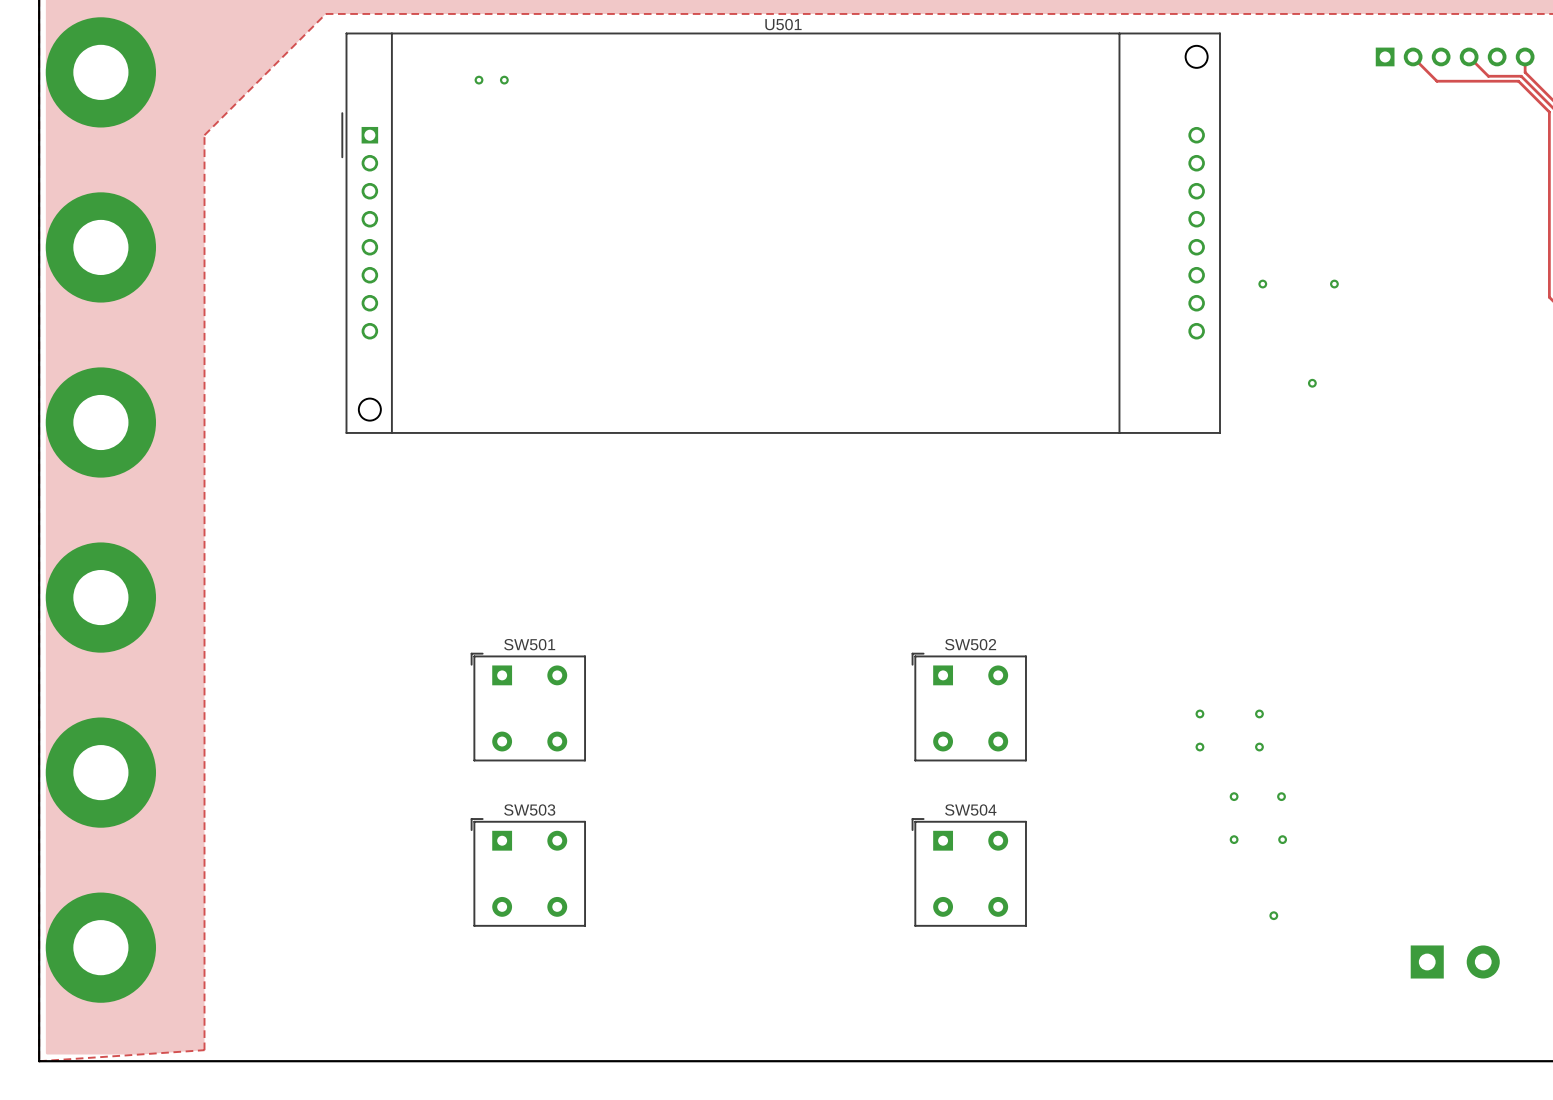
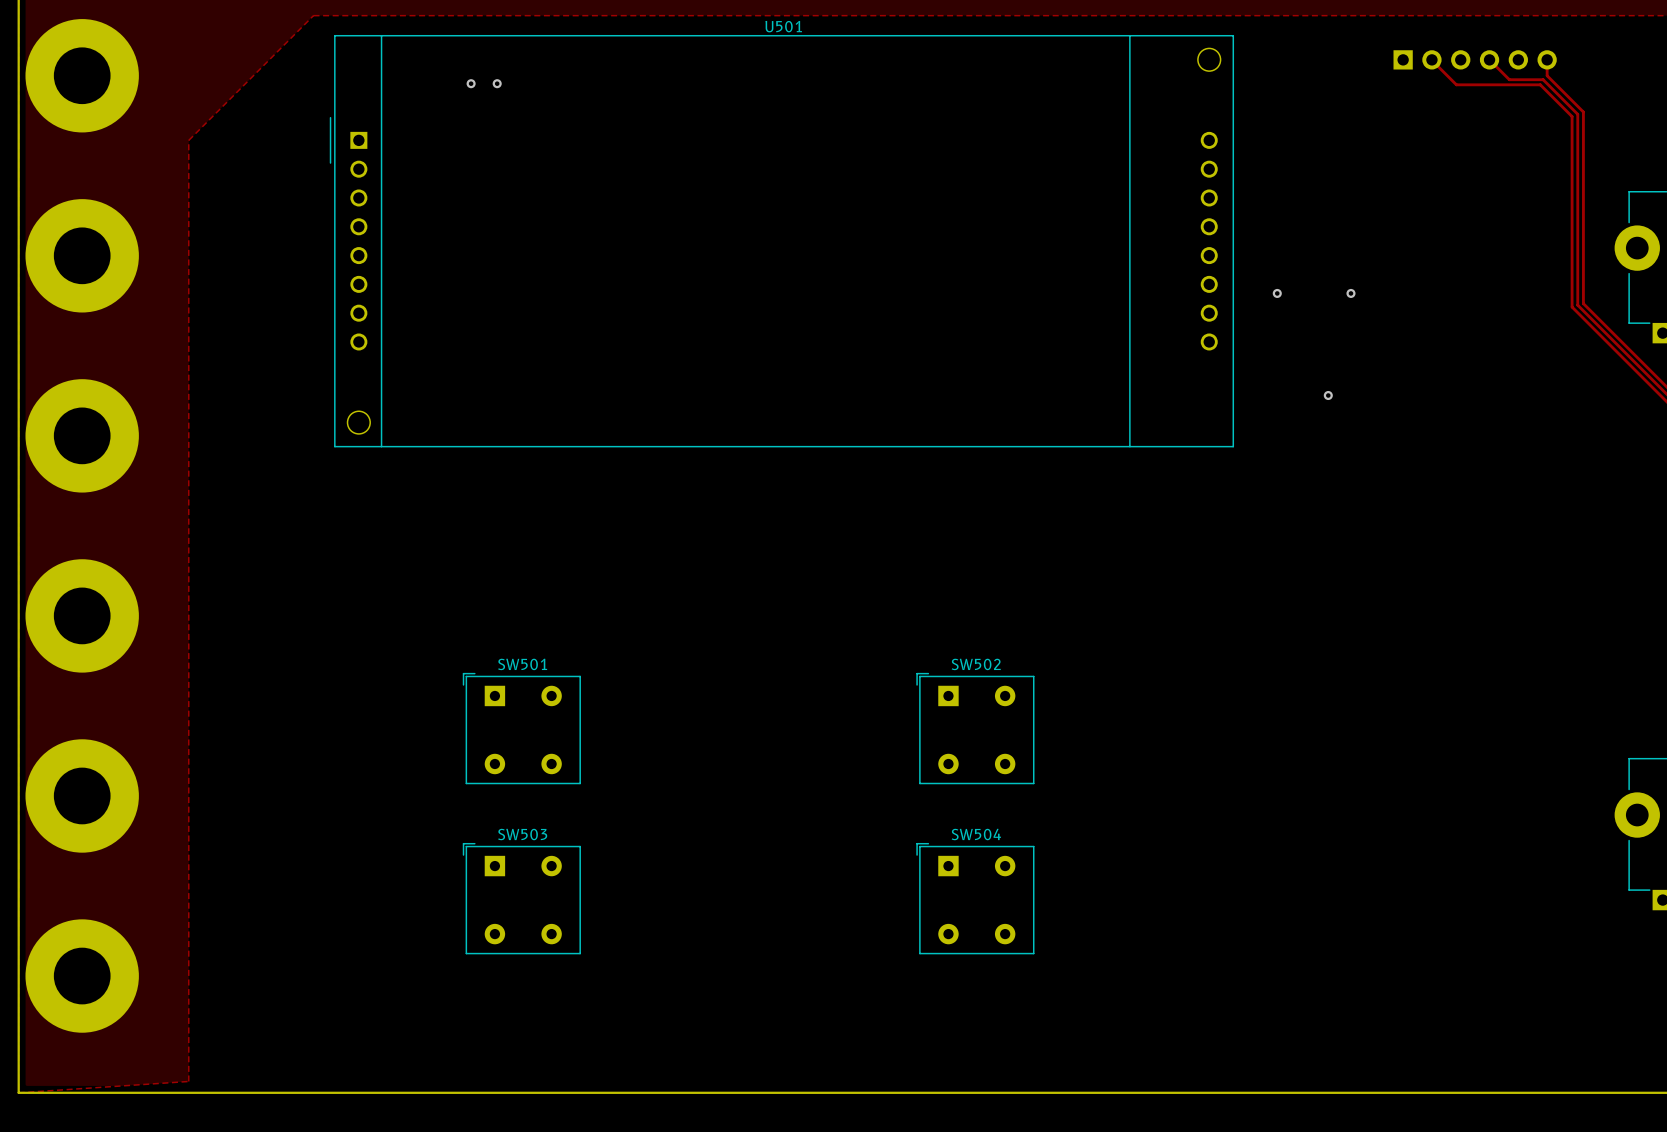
via: (1199, 713) -> none
via: (1259, 713) -> none
via: (1199, 747) -> none
via: (1259, 747) -> none
via: (1234, 796) -> none
via: (1281, 796) -> none
via: (1234, 839) -> none
via: (1282, 839) -> none
via: (1273, 915) -> none
part: (1455, 961) -> none

